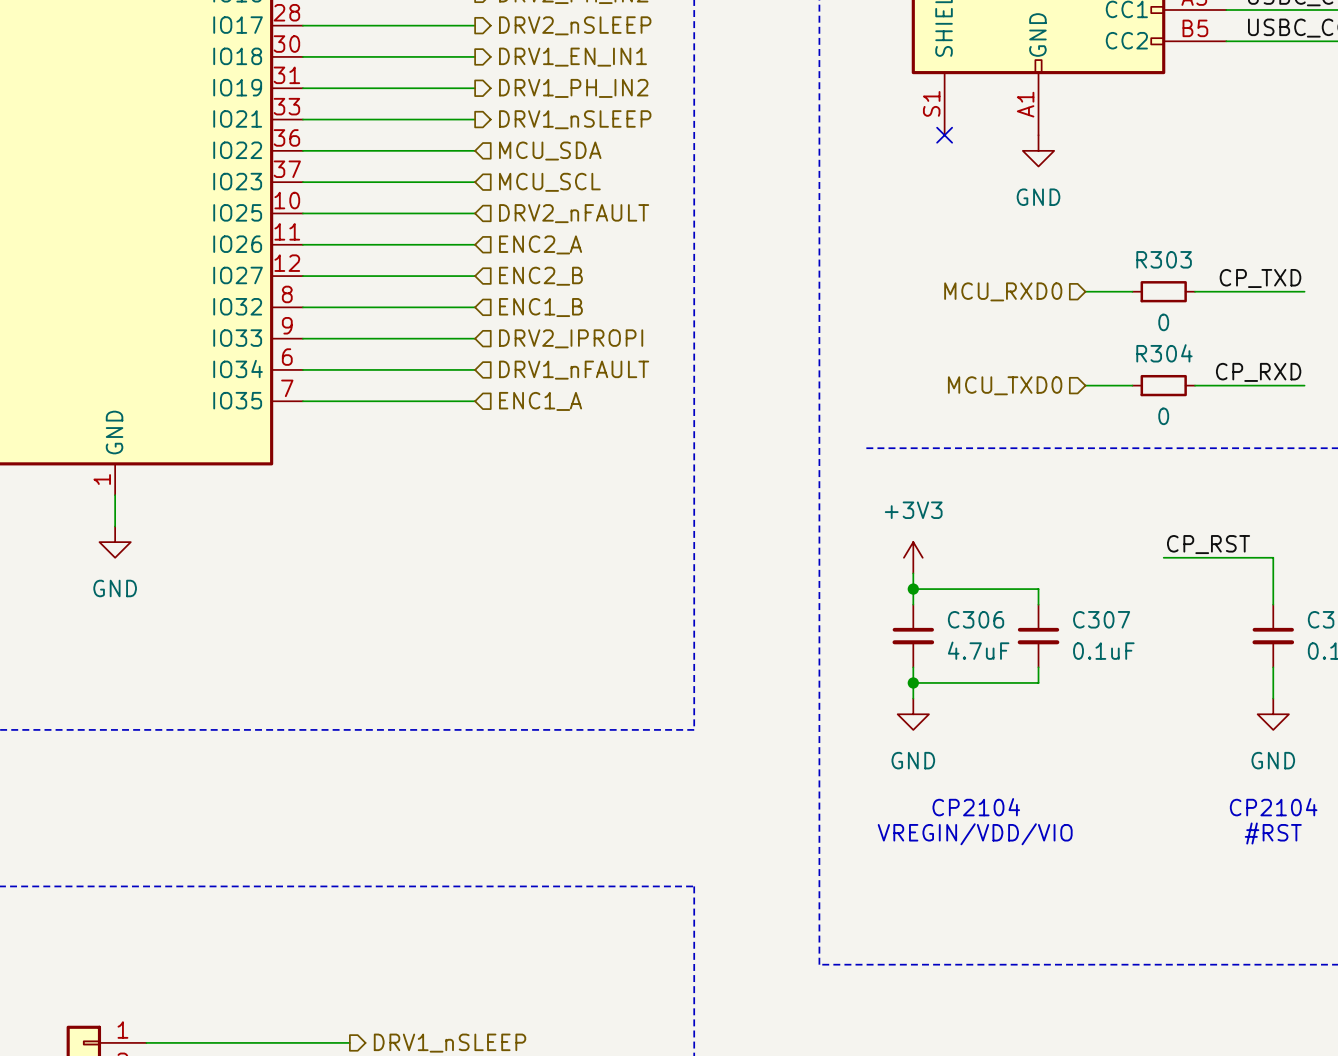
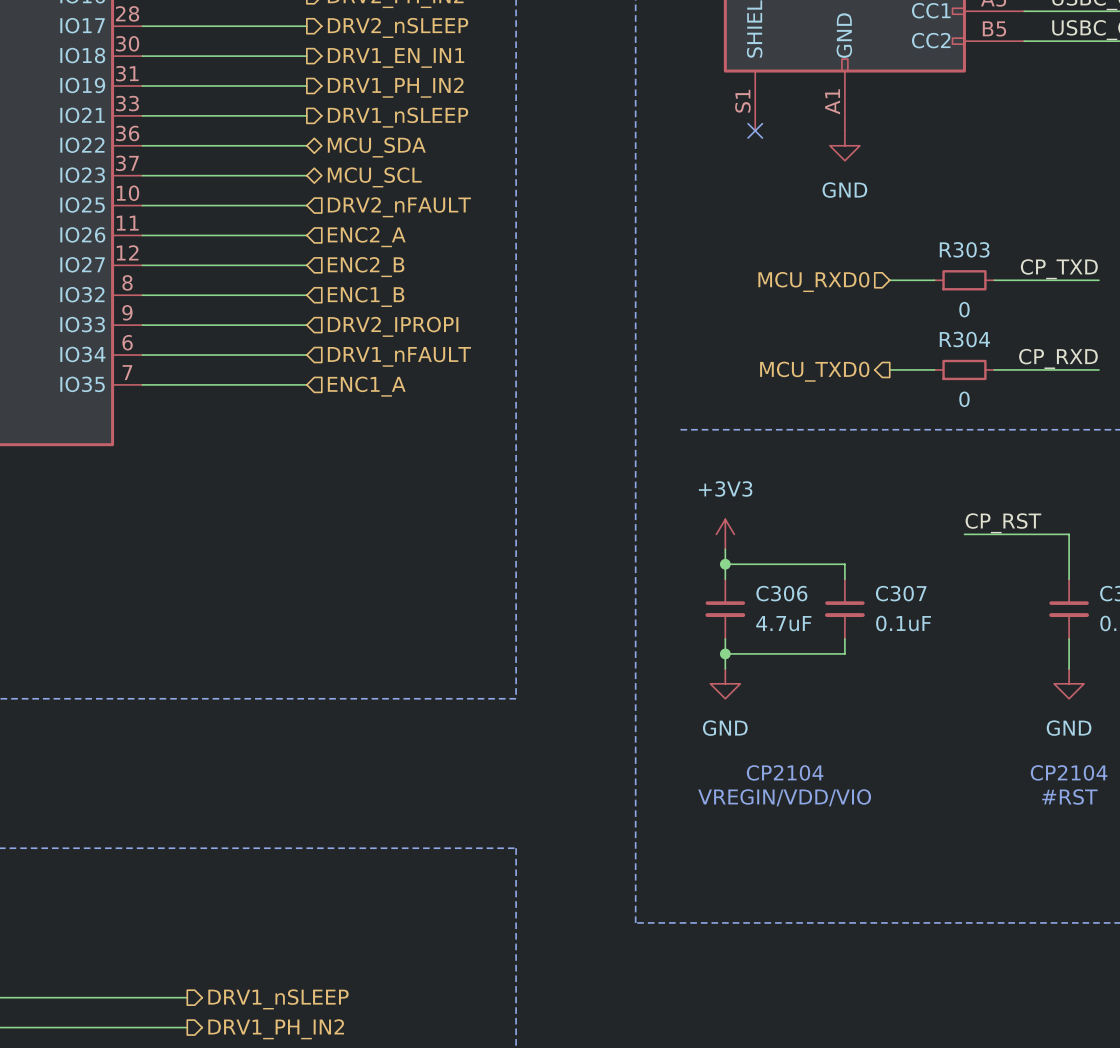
hierarchical label shape: input (550, 151) -> bidirectional (376, 147)
hierarchical label shape: input (549, 182) -> bidirectional (374, 177)
hierarchical label shape: input (1005, 385) -> output (814, 371)

